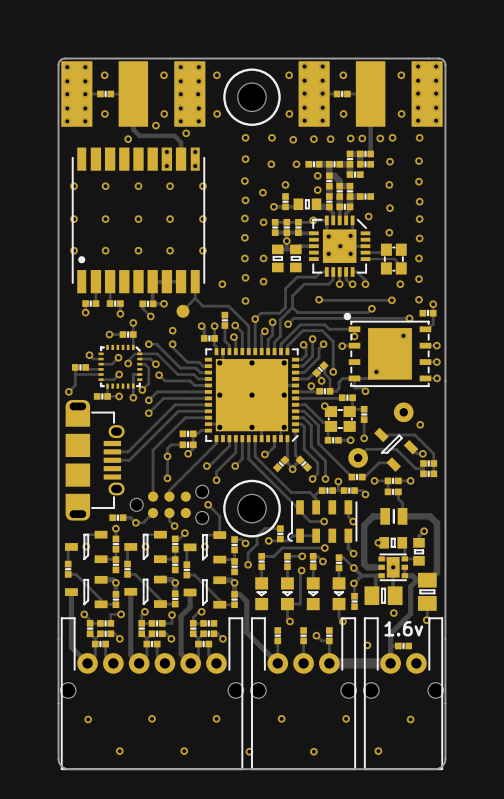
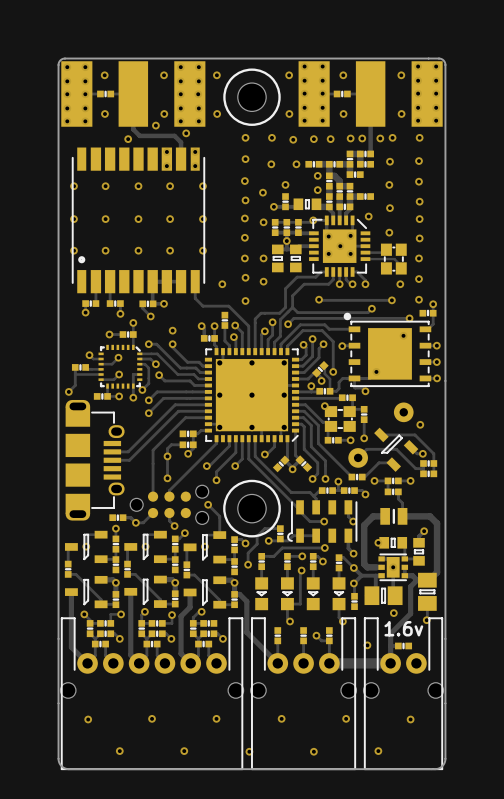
track: (195, 298) (182, 311) -> none
part: (182, 311) -> none
via: (255, 319) -> none
via: (354, 336) -> none
track: (139, 353) (135, 353) (128, 360) (128, 363) -> none
via: (128, 363) -> none

